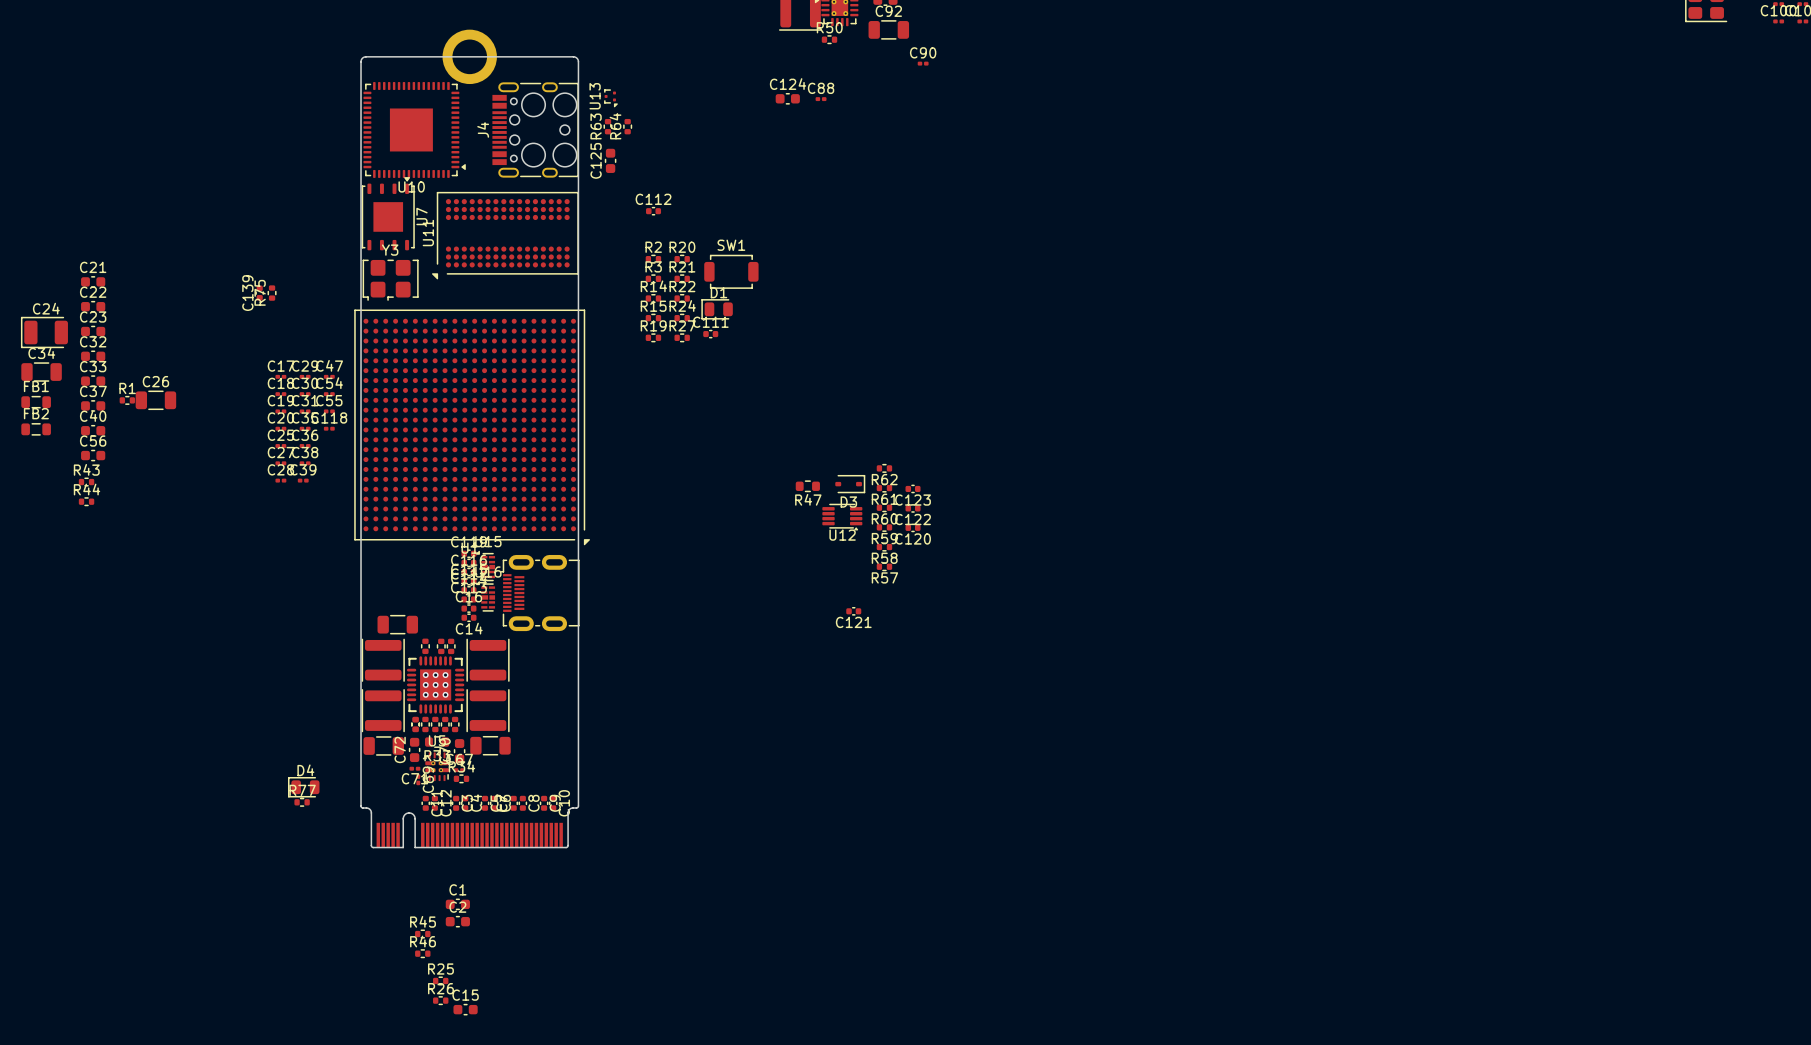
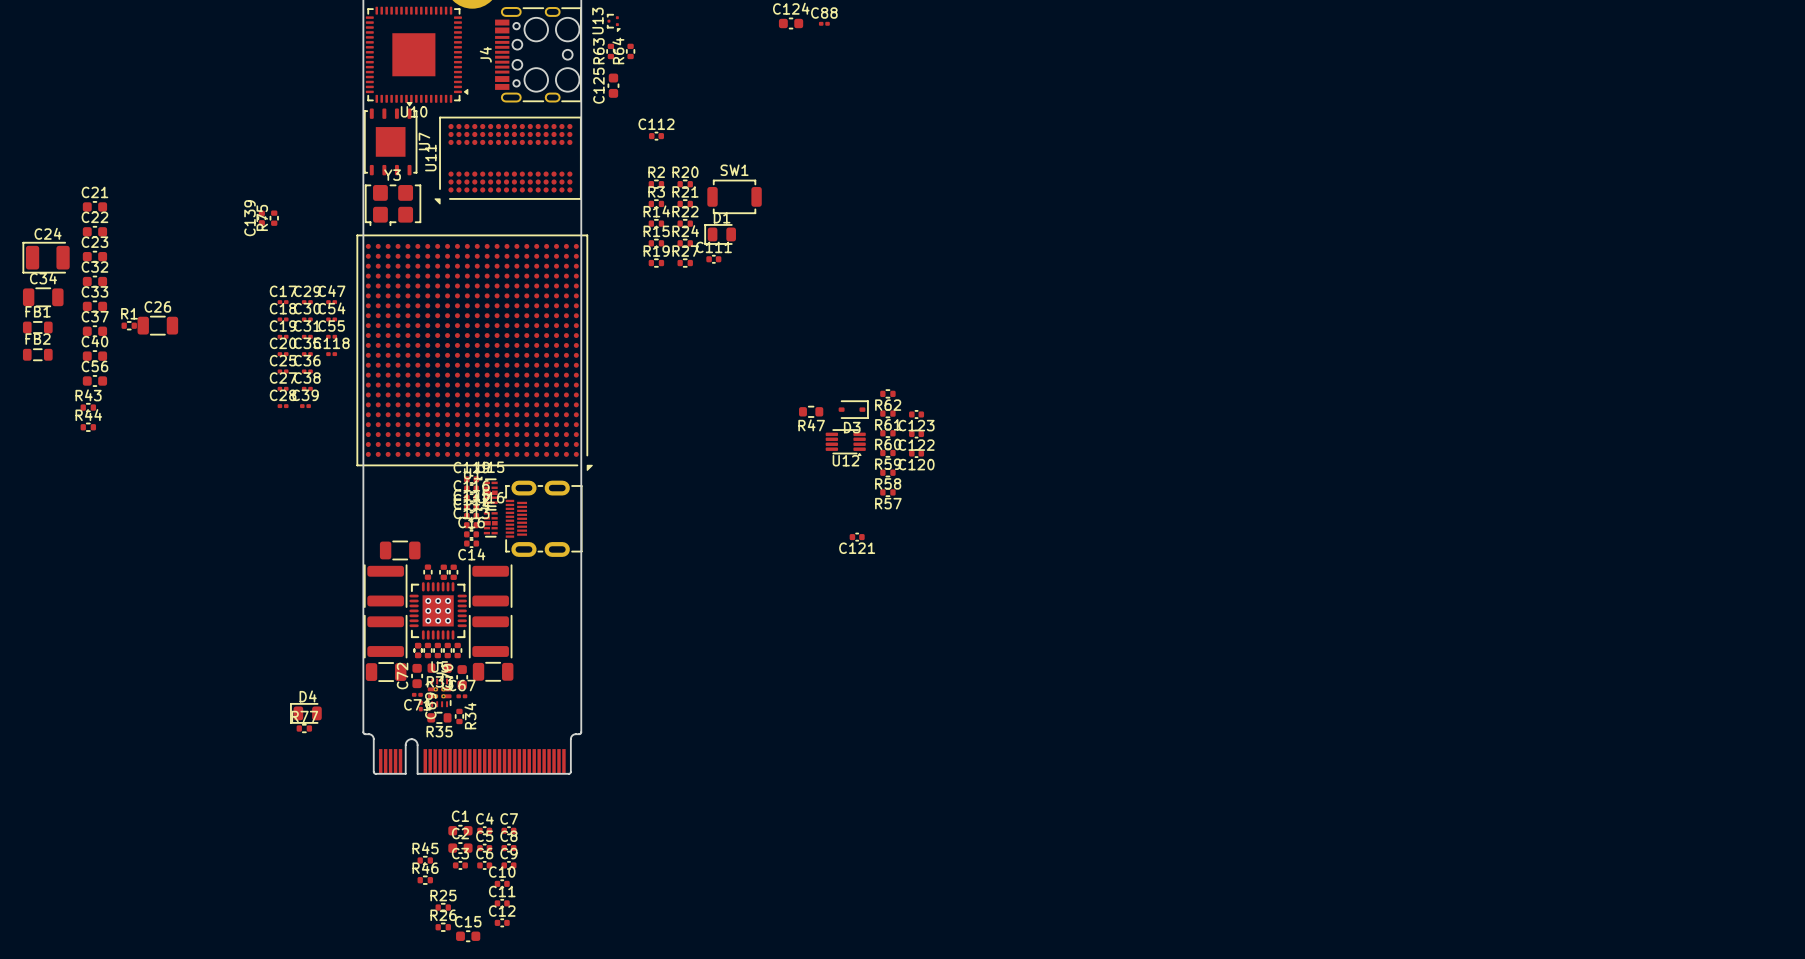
R34 rotation: 0° (461, 778) -> 90° clockwise (459, 716)
R34 position: (461, 778) -> (459, 716)
R35: none -> (439, 717)
C11 rotation: 0° (425, 803) -> 90° clockwise (502, 903)
C11 position: (425, 803) -> (502, 903)
C12 rotation: 0° (434, 803) -> 90° clockwise (502, 922)
C12 position: (434, 803) -> (502, 922)
C3 rotation: 0° (456, 803) -> 90° clockwise (460, 865)
C3 position: (456, 803) -> (460, 865)
C4 rotation: 0° (465, 803) -> 90° clockwise (484, 830)
C4 position: (465, 803) -> (484, 830)
C5 rotation: 0° (485, 803) -> 90° clockwise (484, 848)
C5 position: (485, 803) -> (484, 848)
C6 rotation: 0° (494, 803) -> 90° clockwise (484, 865)
C6 position: (494, 803) -> (484, 865)
C7 rotation: 0° (513, 803) -> 90° clockwise (508, 830)
C7 position: (513, 803) -> (508, 830)
C8 rotation: 0° (522, 803) -> 90° clockwise (508, 848)
C8 position: (522, 803) -> (508, 848)
C9 rotation: 0° (544, 803) -> 90° clockwise (508, 865)
C9 position: (544, 803) -> (508, 865)
C10 rotation: 0° (553, 803) -> 90° clockwise (502, 883)
C10 position: (553, 803) -> (502, 883)

